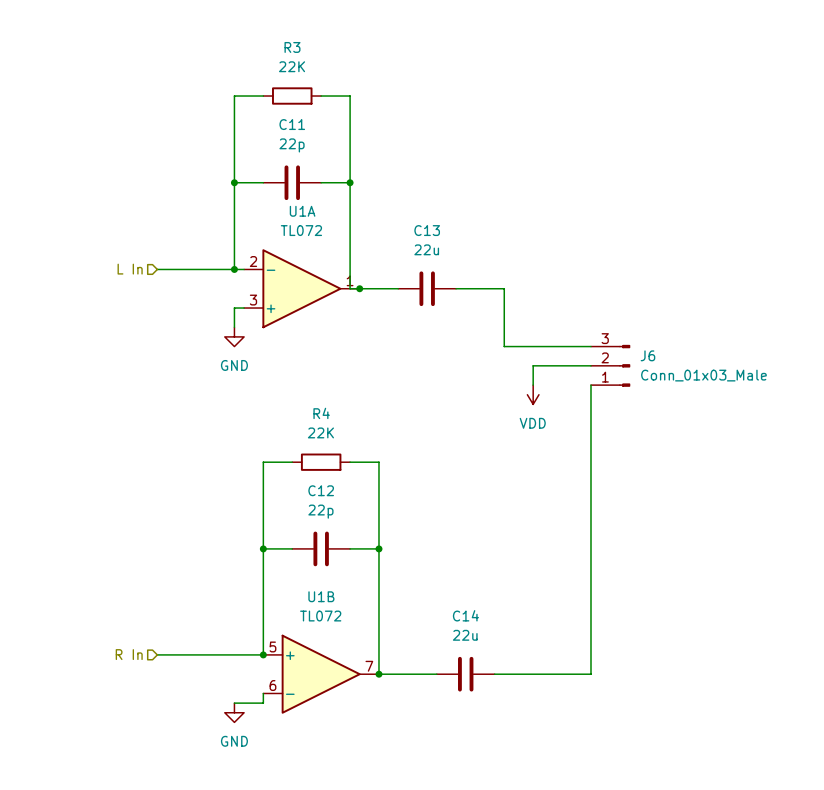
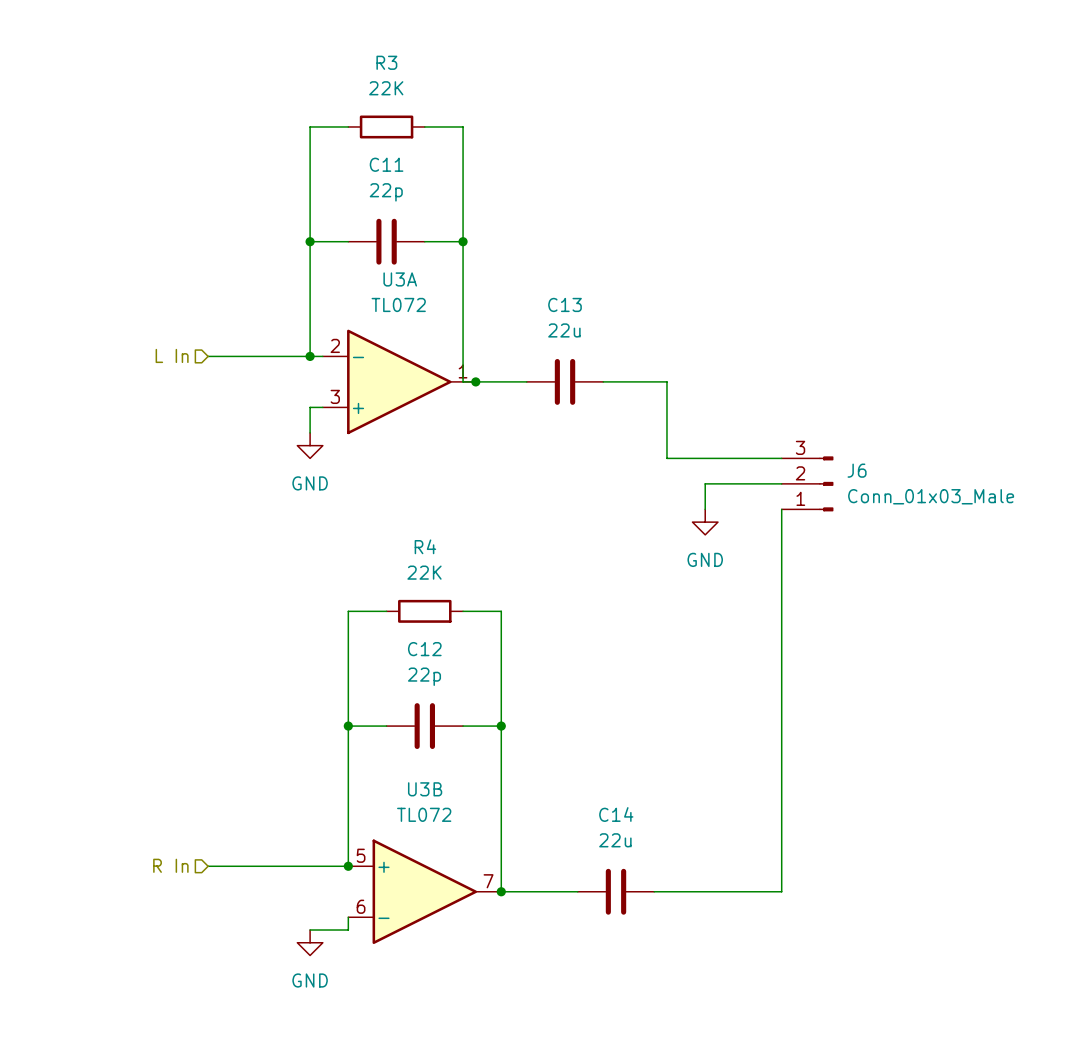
U1A name: U1A (302, 211) -> U3A (400, 279)
power symbol: VDD (533, 394) -> GND (705, 522)
U1B name: U1B (321, 596) -> U3B (425, 789)

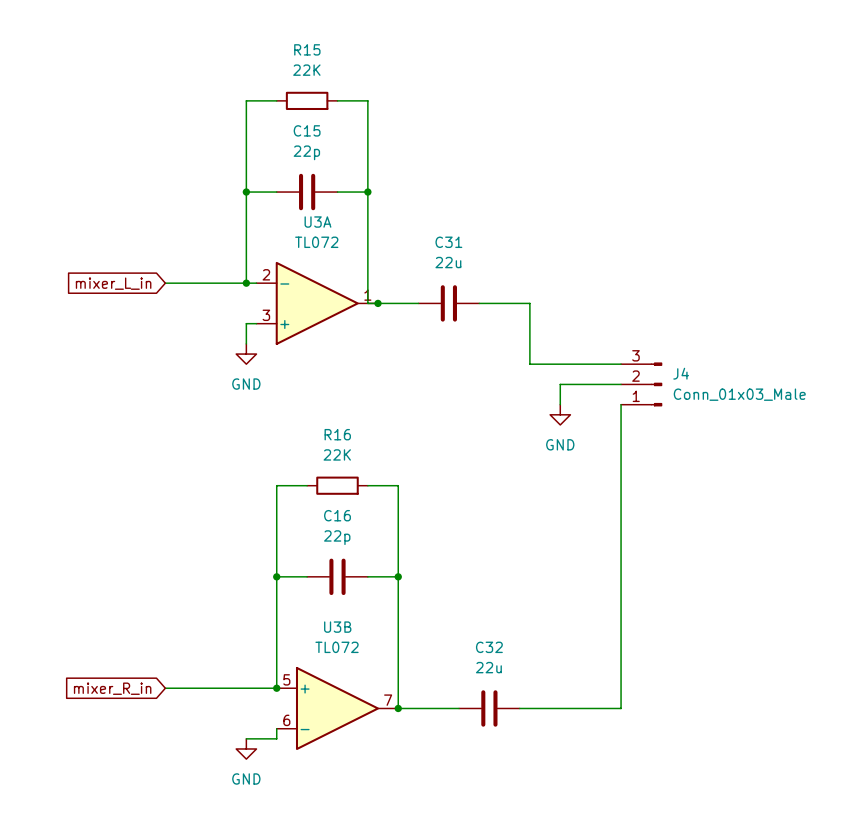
R3 name: R3 (386, 62) -> R15 (307, 49)
C11 name: C11 (386, 164) -> C15 (307, 130)
C13 name: C13 (565, 304) -> C31 (448, 242)
hierarchical label: L In (172, 355) -> none
global label: none -> mixer_L_in (113, 283)
J6 name: J6 (857, 470) -> J4 (681, 373)
R4 name: R4 (425, 546) -> R16 (337, 434)
C12 name: C12 (424, 649) -> C16 (337, 515)
C14 name: C14 (616, 814) -> C32 (489, 647)
hierarchical label: R In (170, 865) -> none
global label: none -> mixer_R_in (112, 688)

